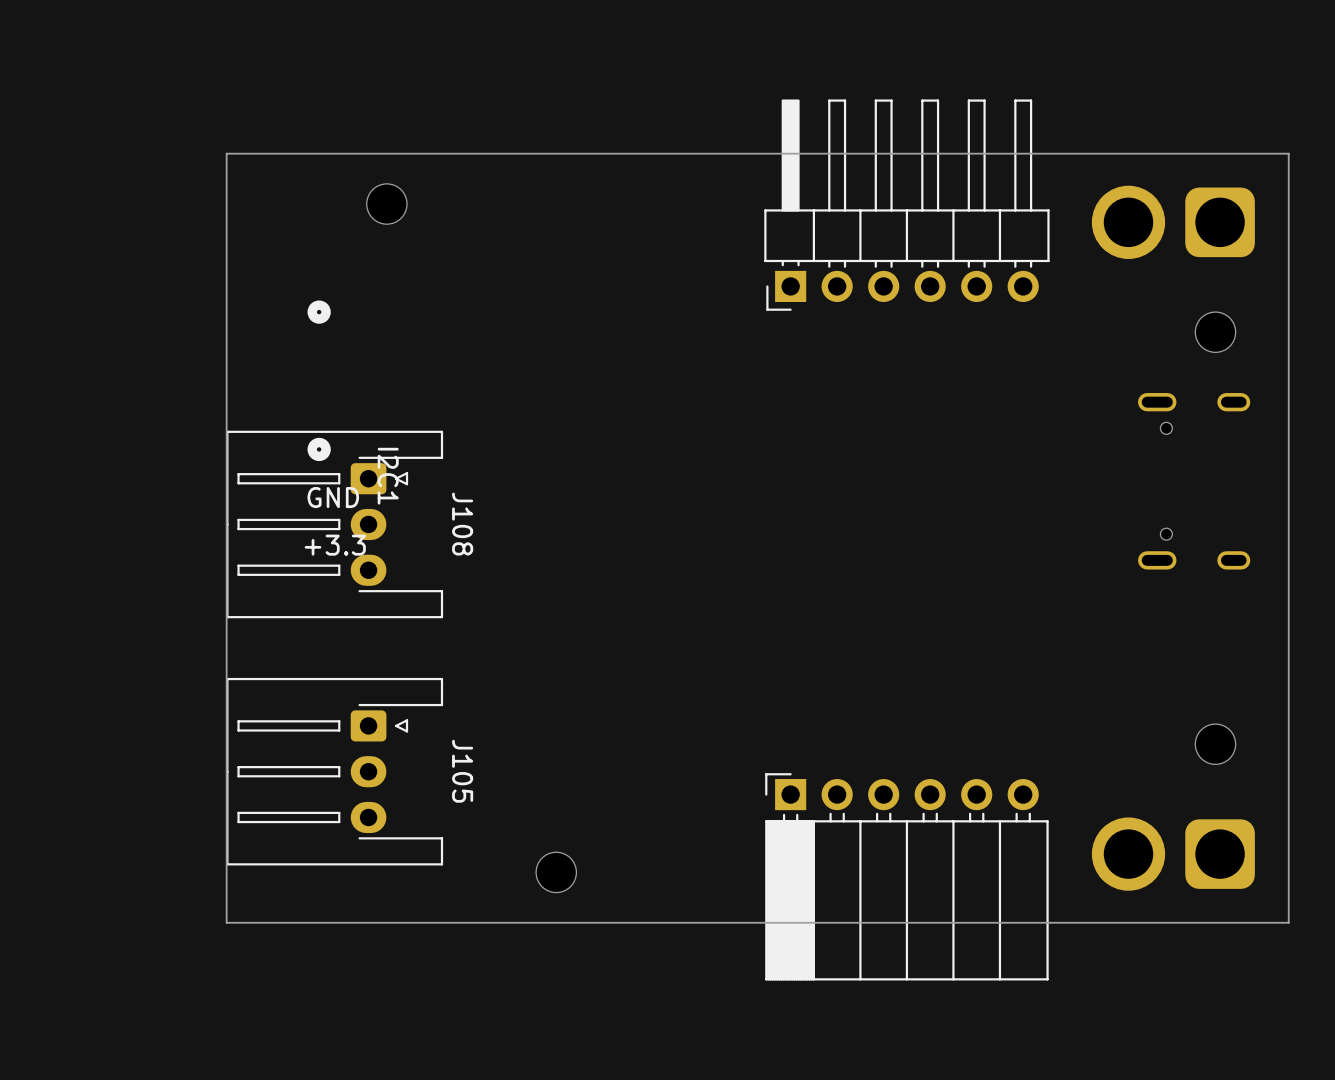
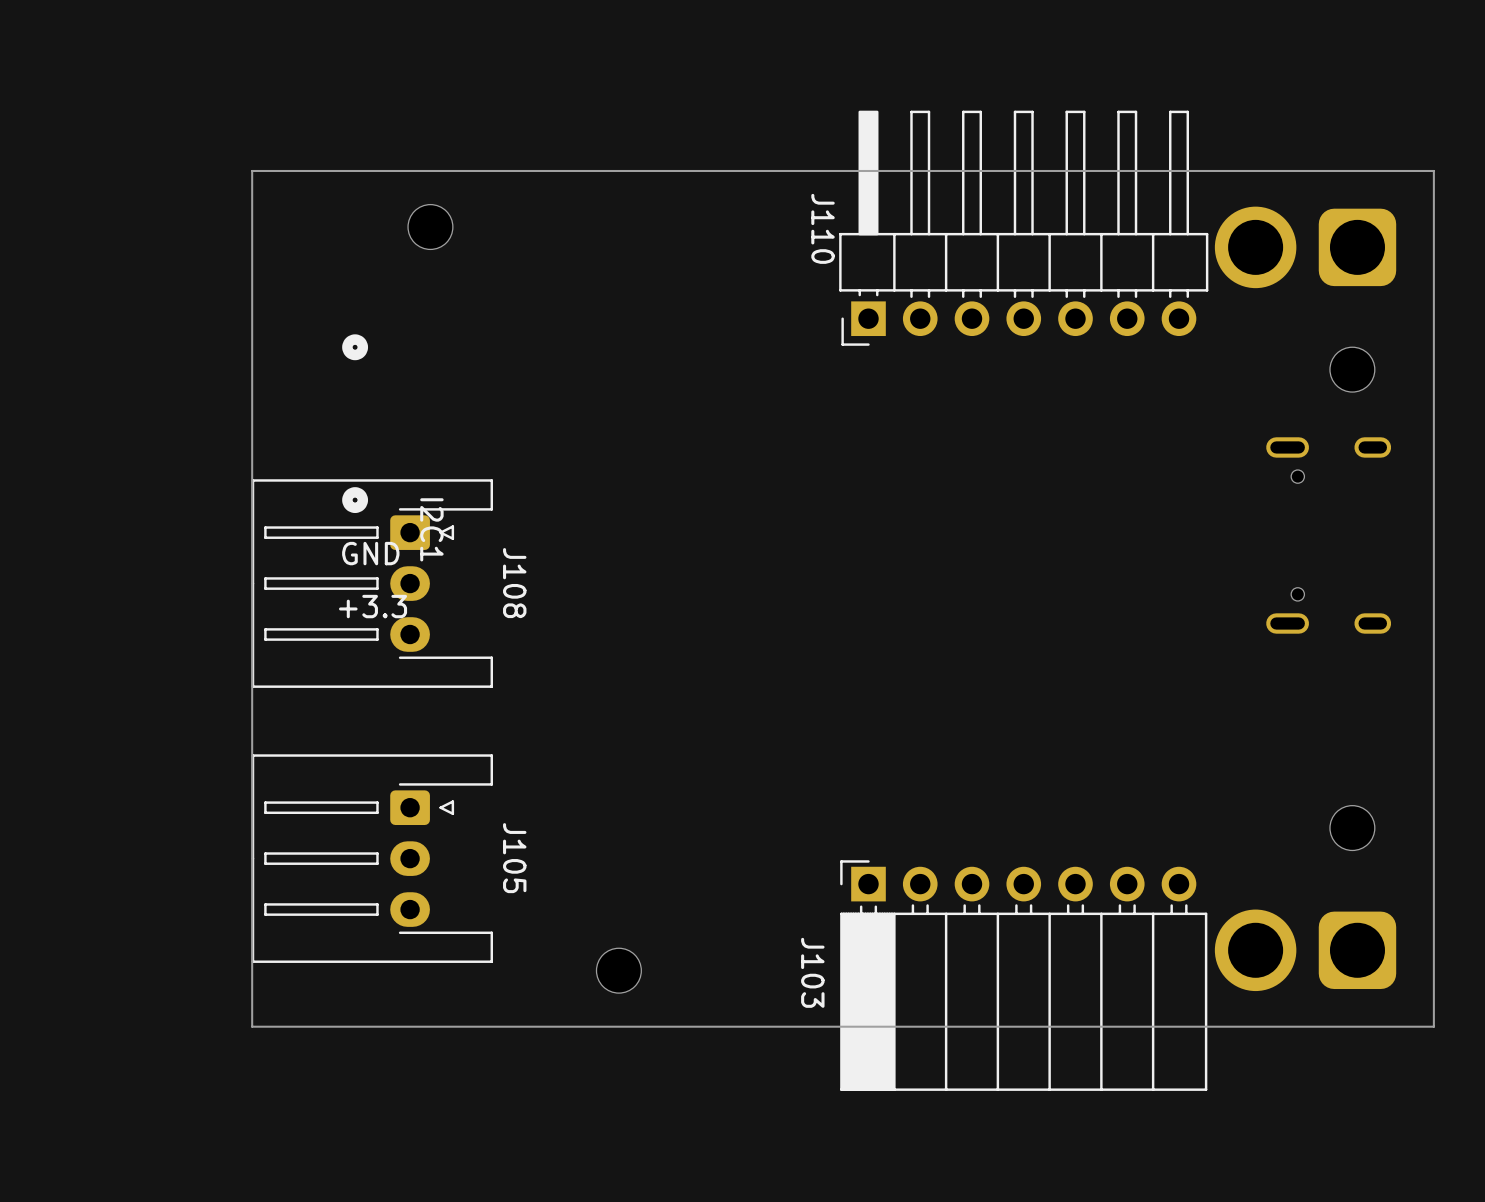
part: (906, 205) -> none
J110: none -> (1023, 228)
part: (906, 876) -> none
J103: none -> (1023, 975)

